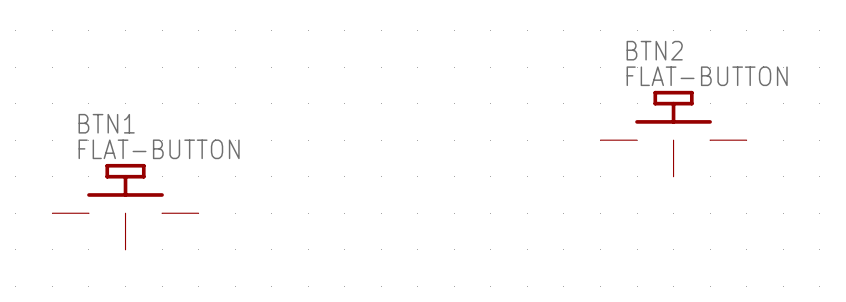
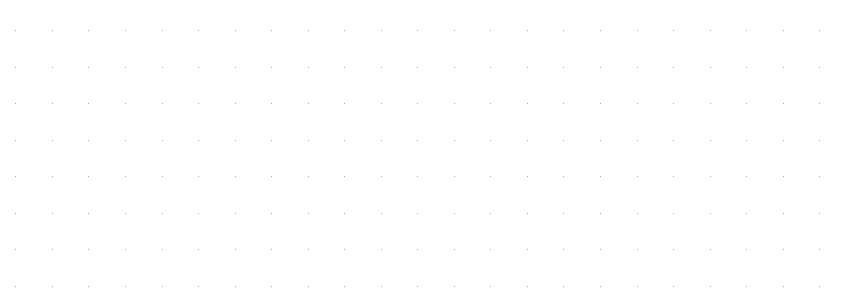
BTN2: FLAT-BUTTON (673, 133) -> none
BTN1: FLAT-BUTTON (125, 206) -> none

